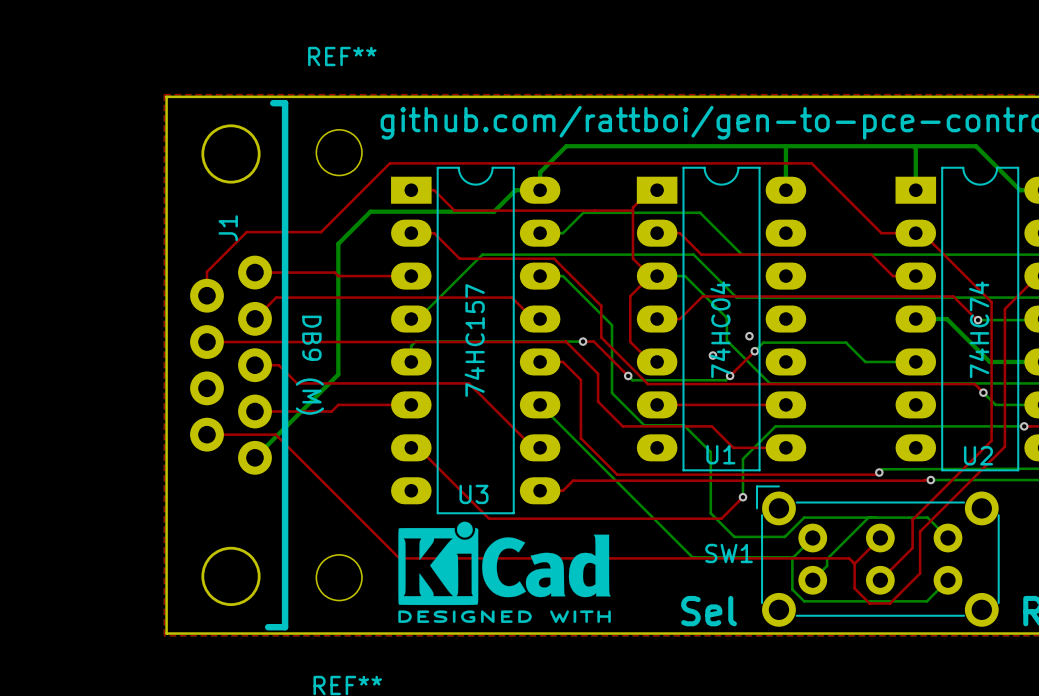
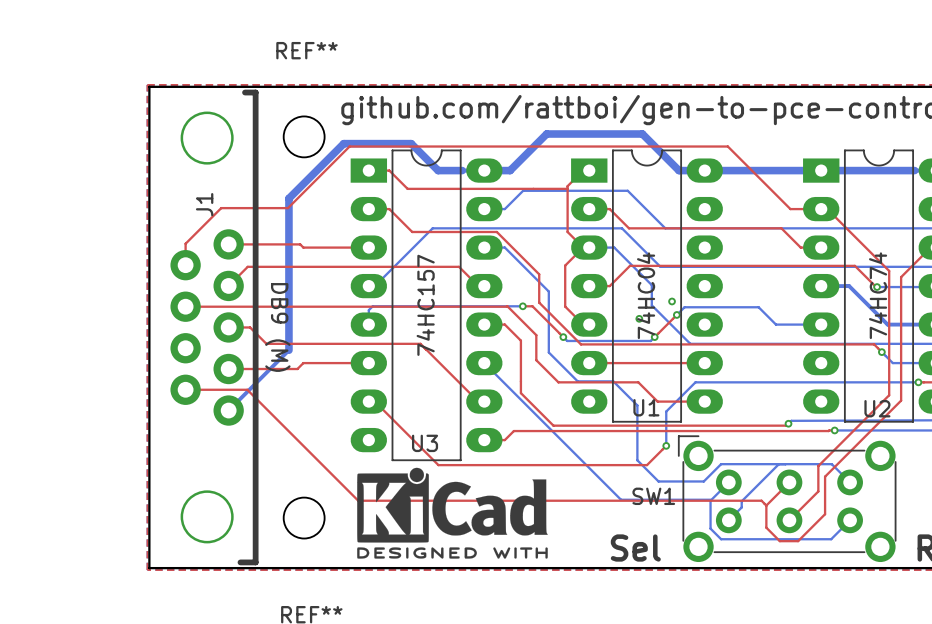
bottom track: (785, 146) (785, 190) -> none
bottom track: (913, 146) (915, 148) (915, 190) -> none
bottom track: (515, 190) (494, 211) (370, 211) (338, 243) (338, 374) (322, 390) -> (462, 170) (438, 170) (411, 143) (343, 143) (288, 198) (288, 350)
bottom track: (540, 190) (540, 172) (566, 146) (976, 146) (1020, 190) -> (484, 170) (510, 170) (546, 134) (642, 134) (679, 170) (914, 170)

